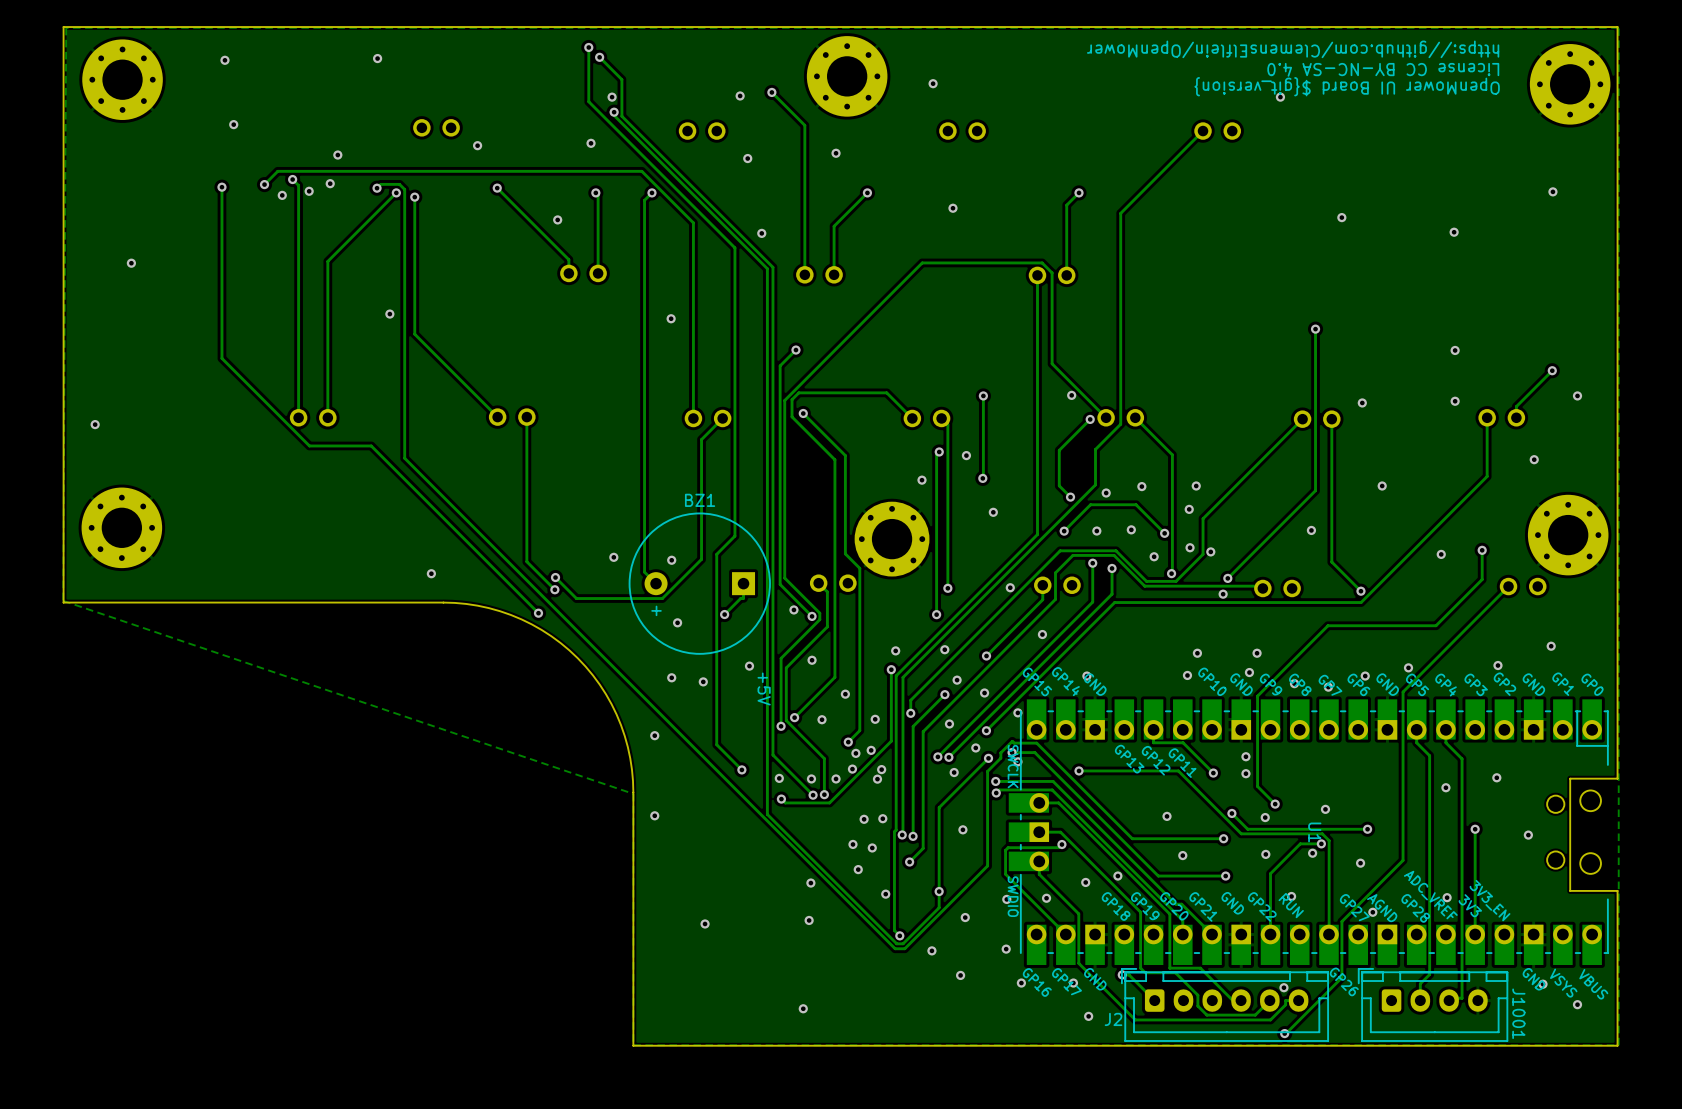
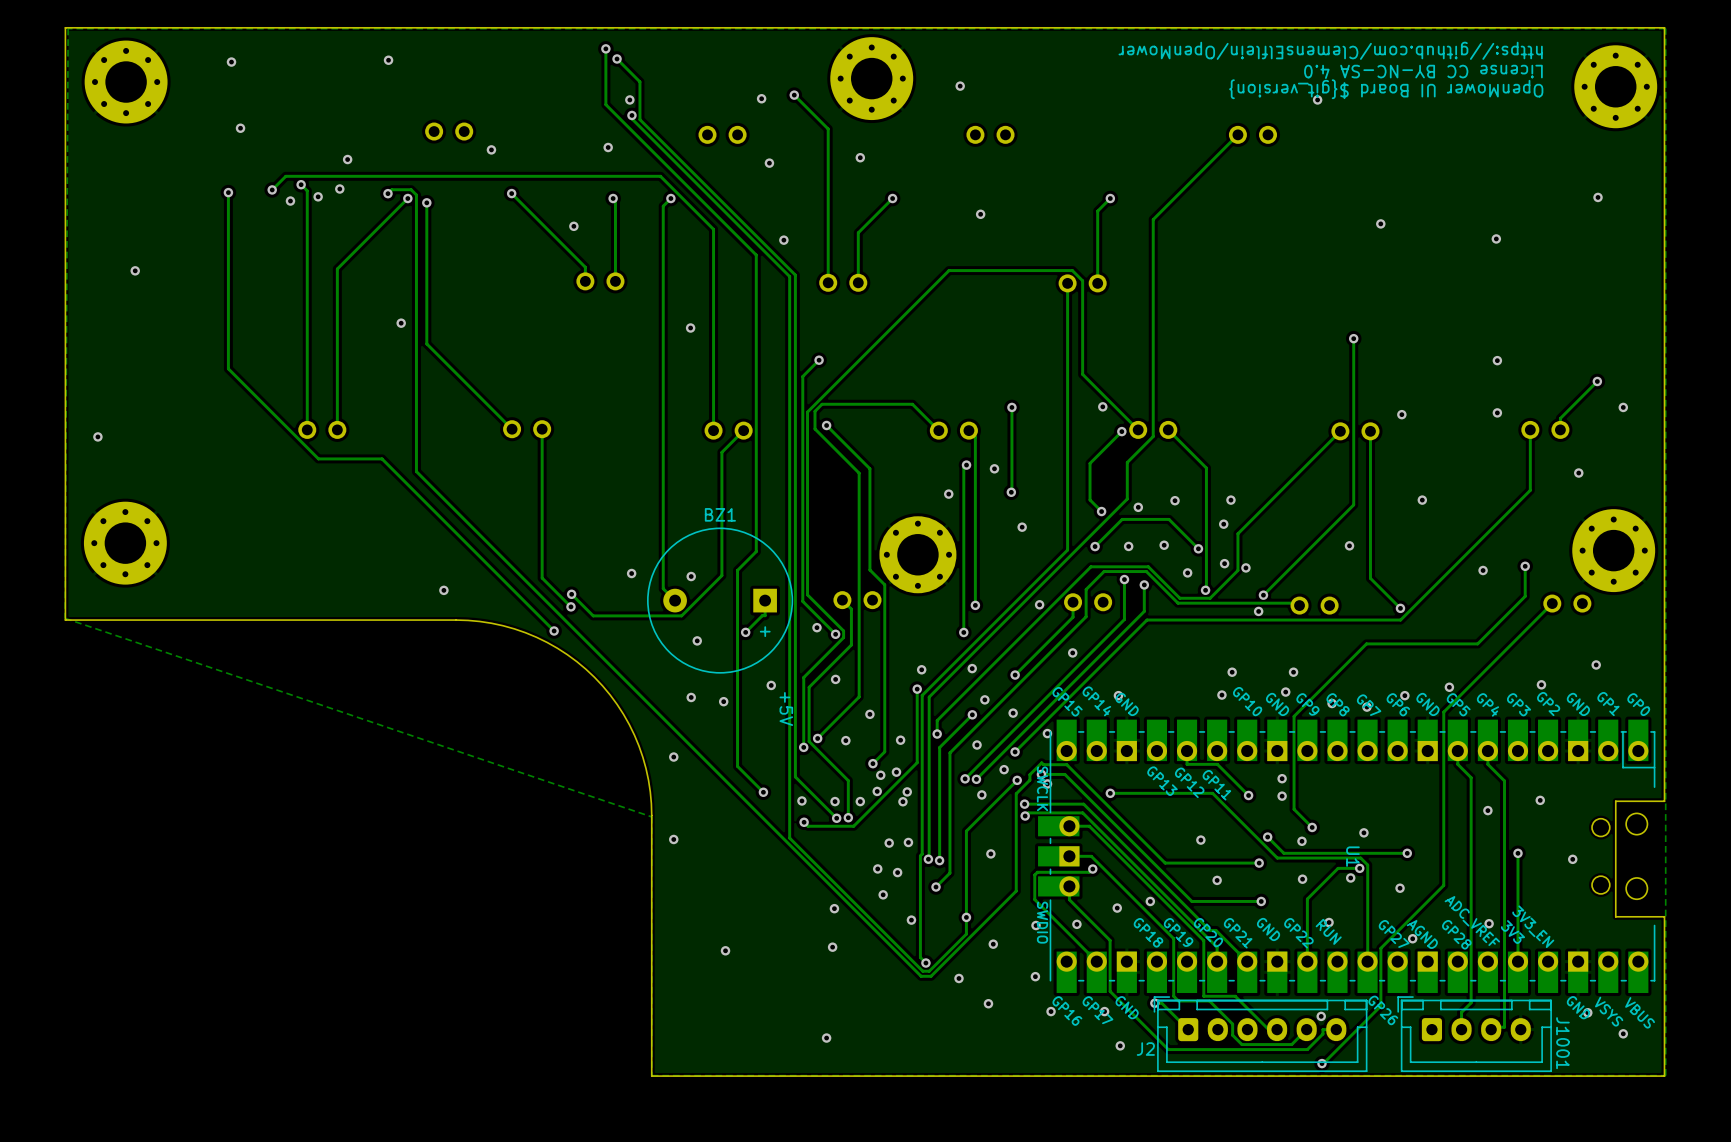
BZ1 text position: + (656, 610) -> + (765, 631)

